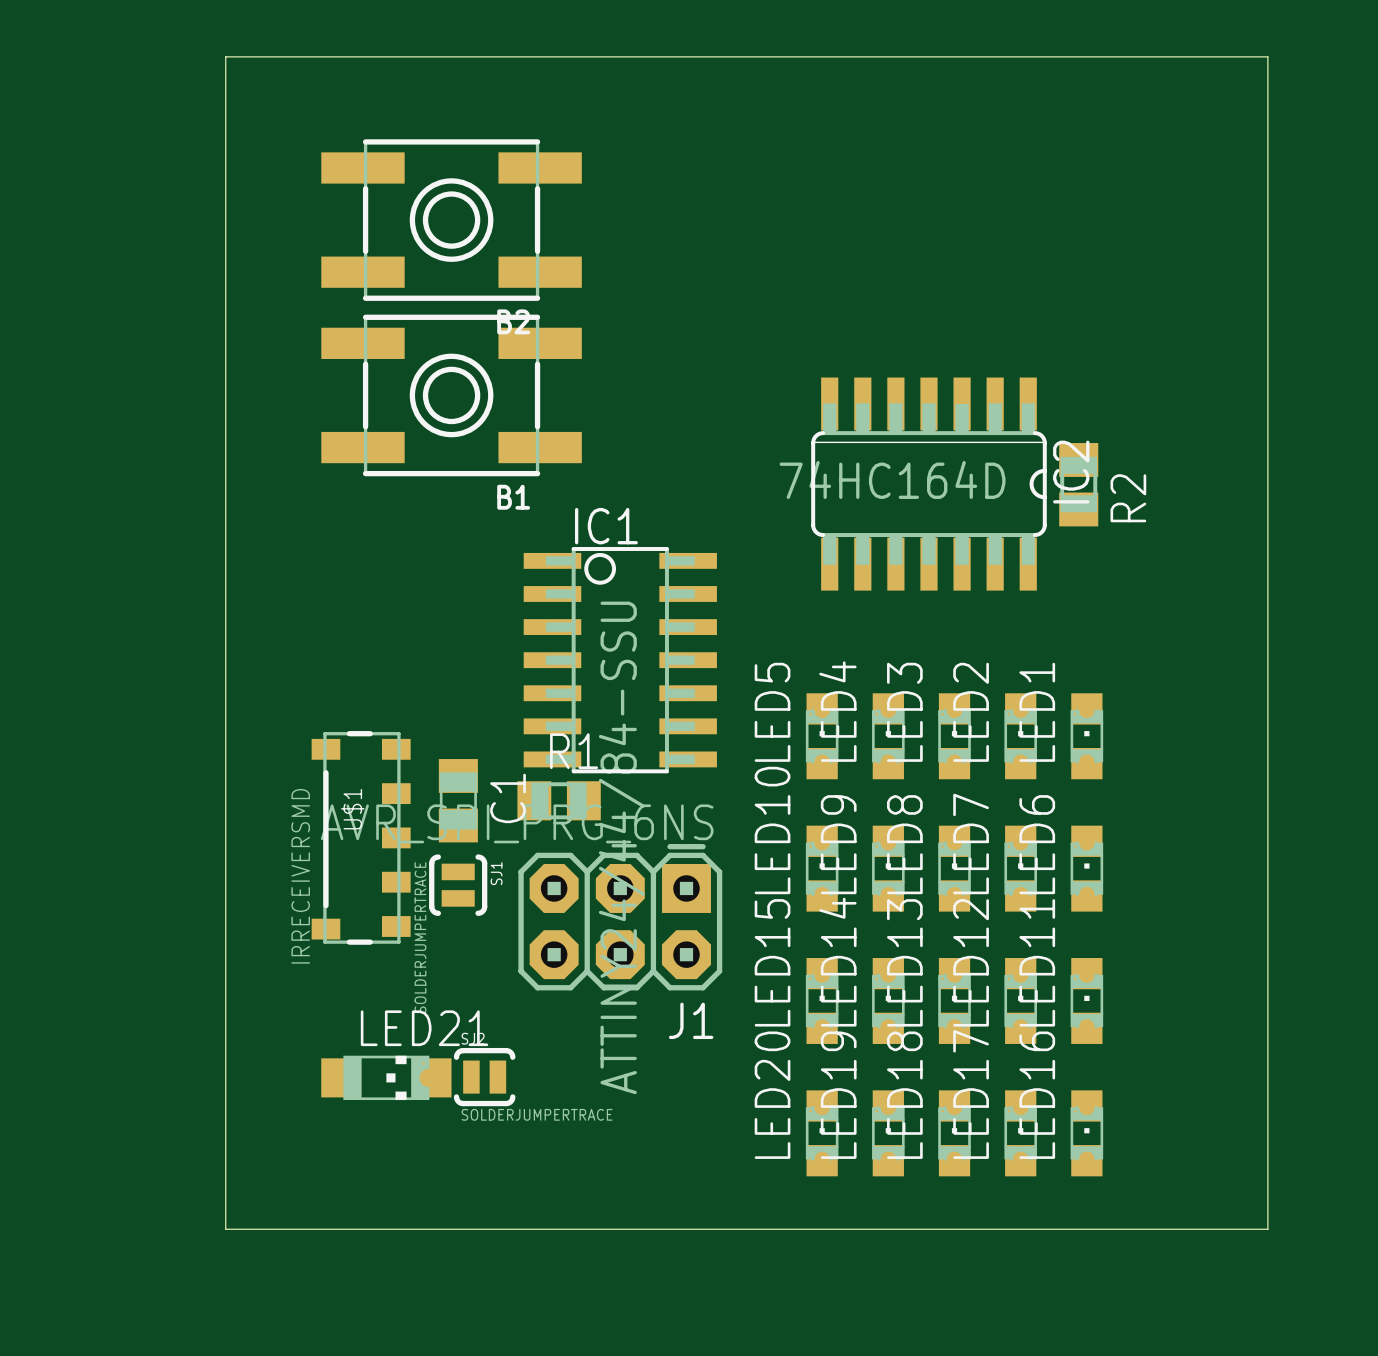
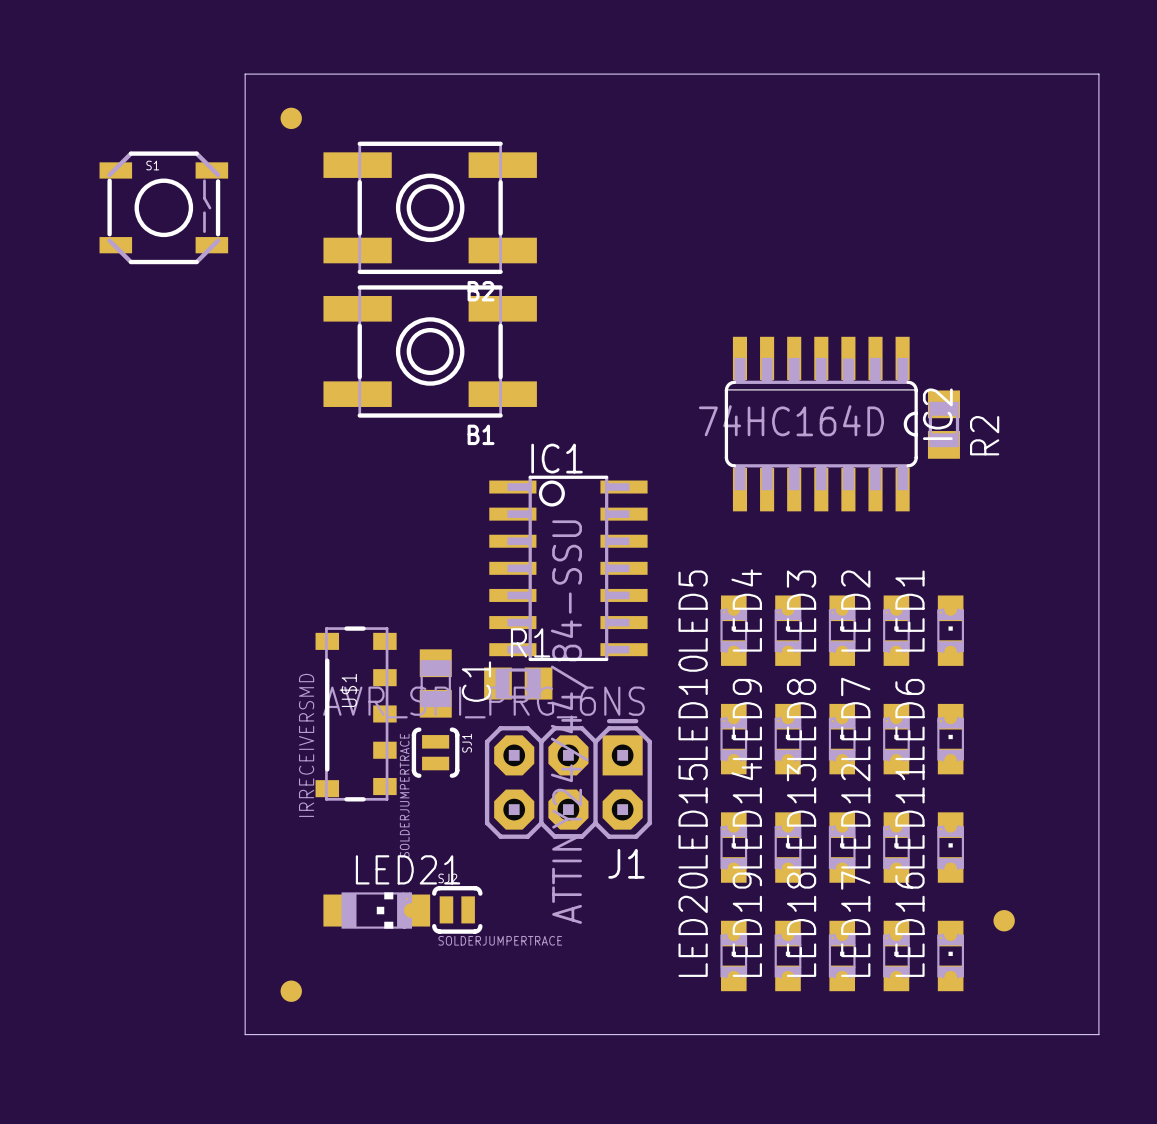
part: none -> (291, 118)
S1: none -> (163, 207)
part: none -> (1004, 920)
part: none -> (291, 991)

